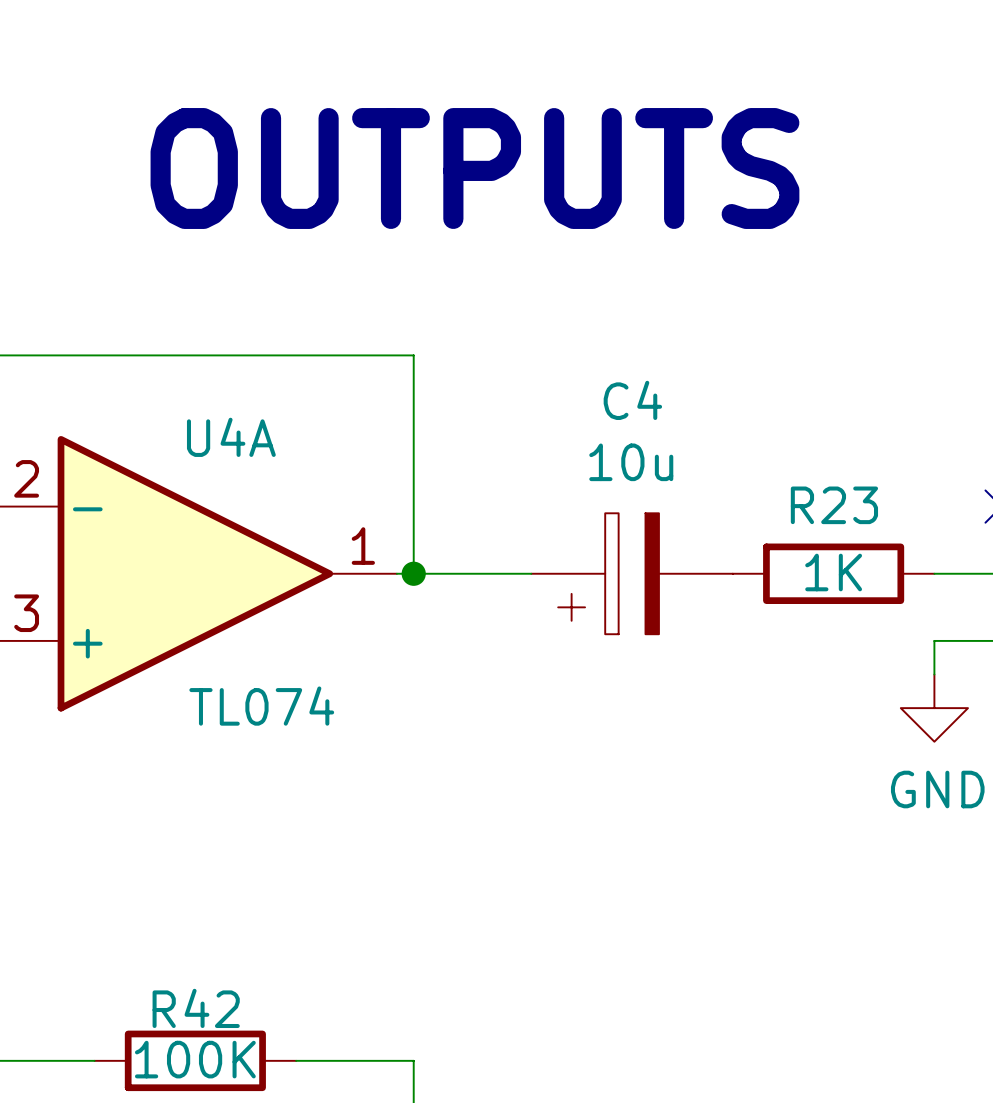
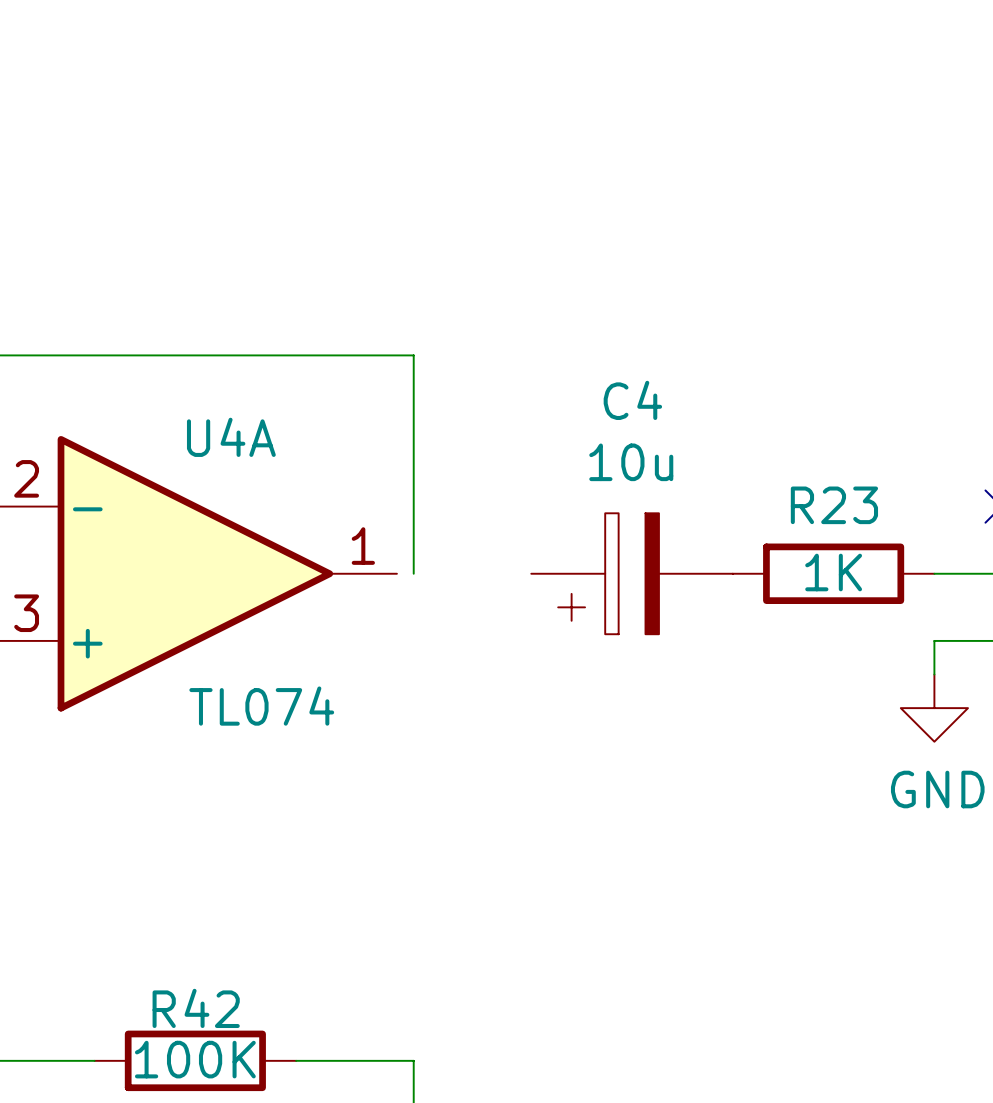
text: OUTPUTS (474, 168) -> none
wire: (396, 573) (531, 573) -> none
junction: (413, 573) -> none

